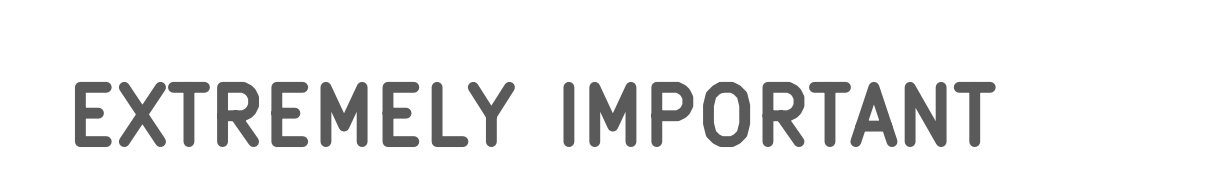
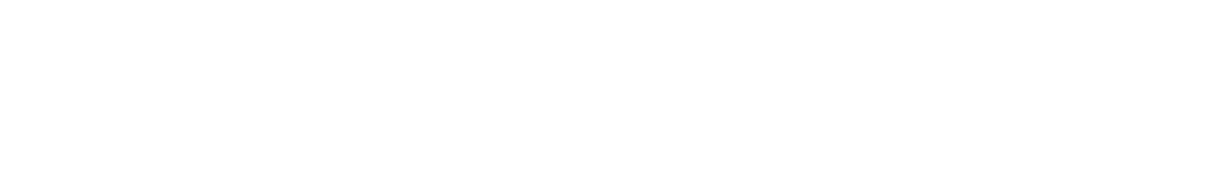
text: EXTREMELY IMPORTANT (535, 114) -> none

